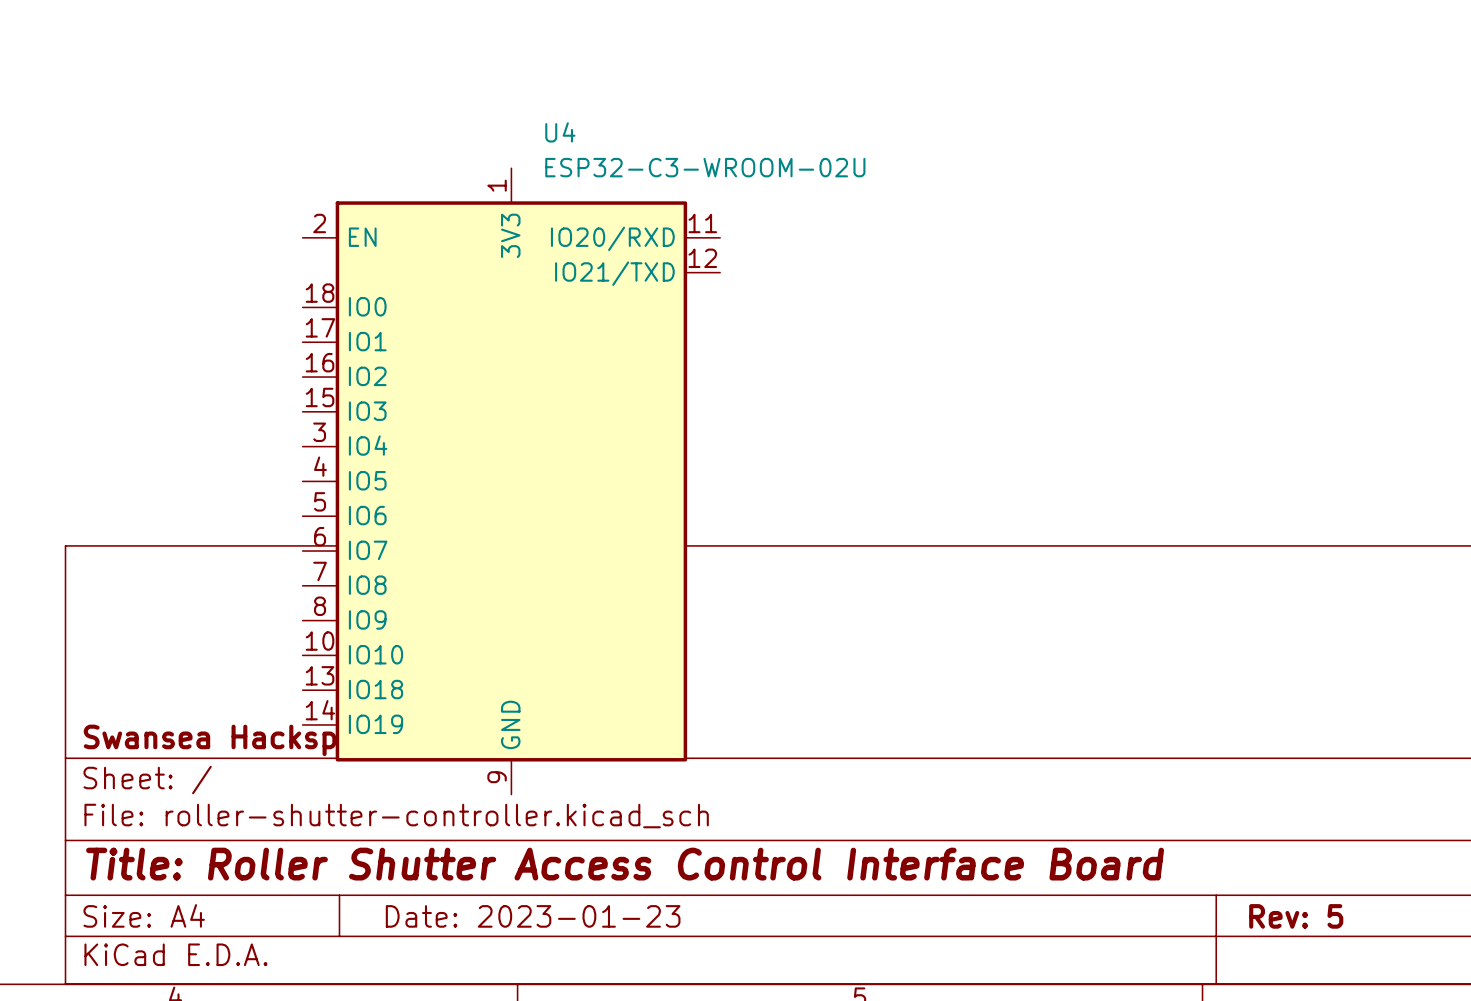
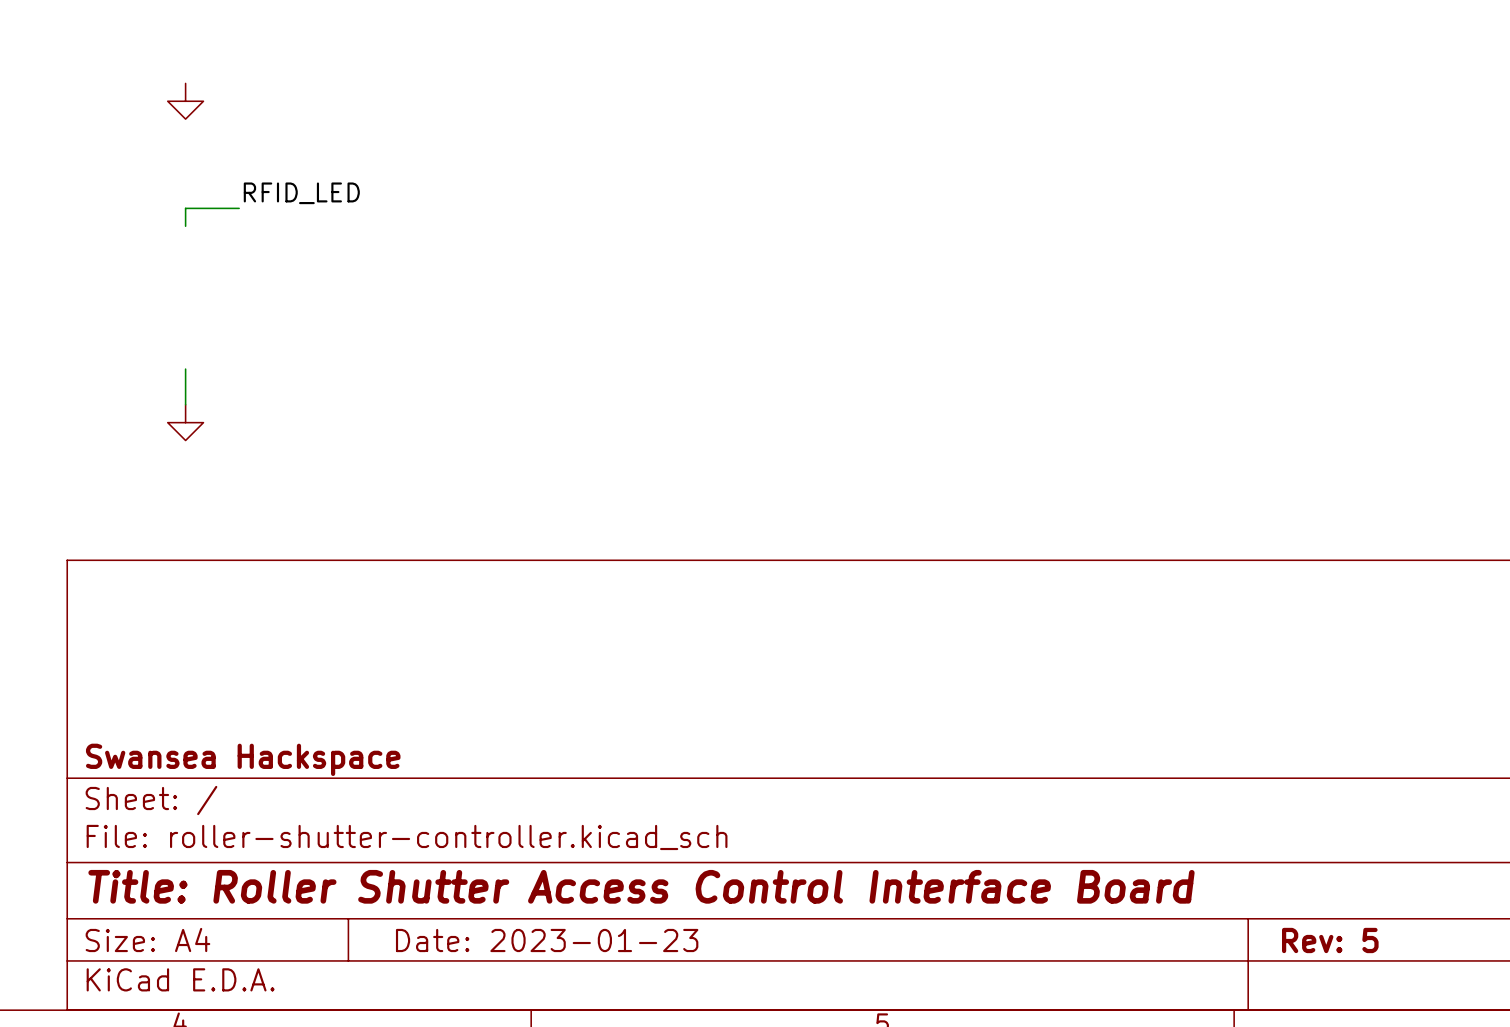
power symbol: none -> (185, 101)
label: none -> RFID_LED (301, 193)
wire: none -> (239, 208) (185, 208) (185, 226)
wire: none -> (185, 369) (185, 404)
power symbol: none -> (185, 422)
U4: ESP32-C3-WROOM-02U (511, 481) -> none

